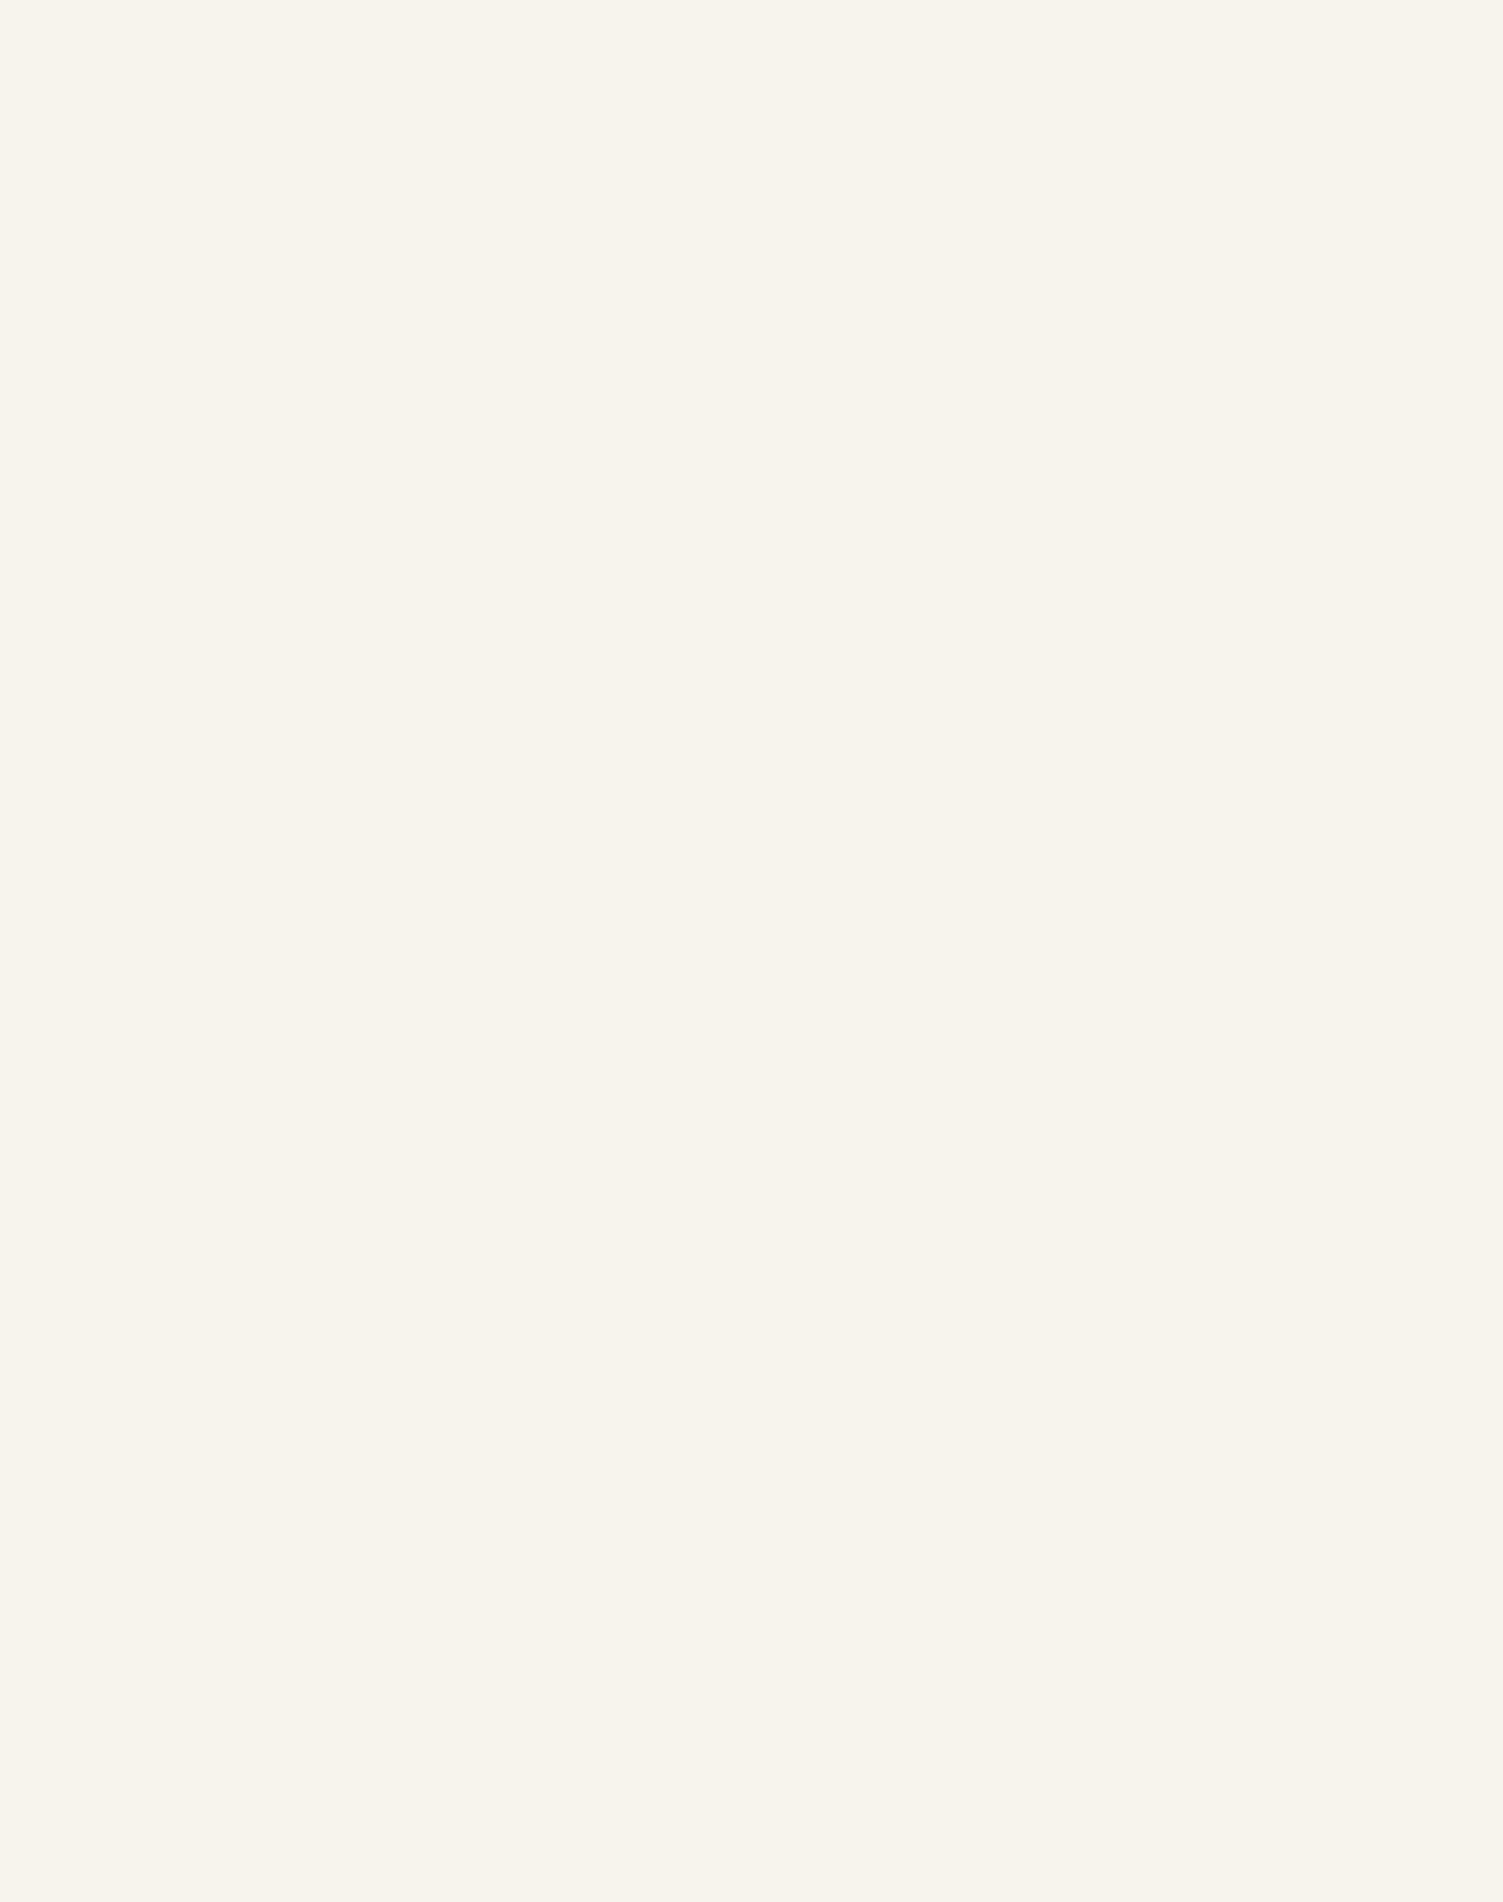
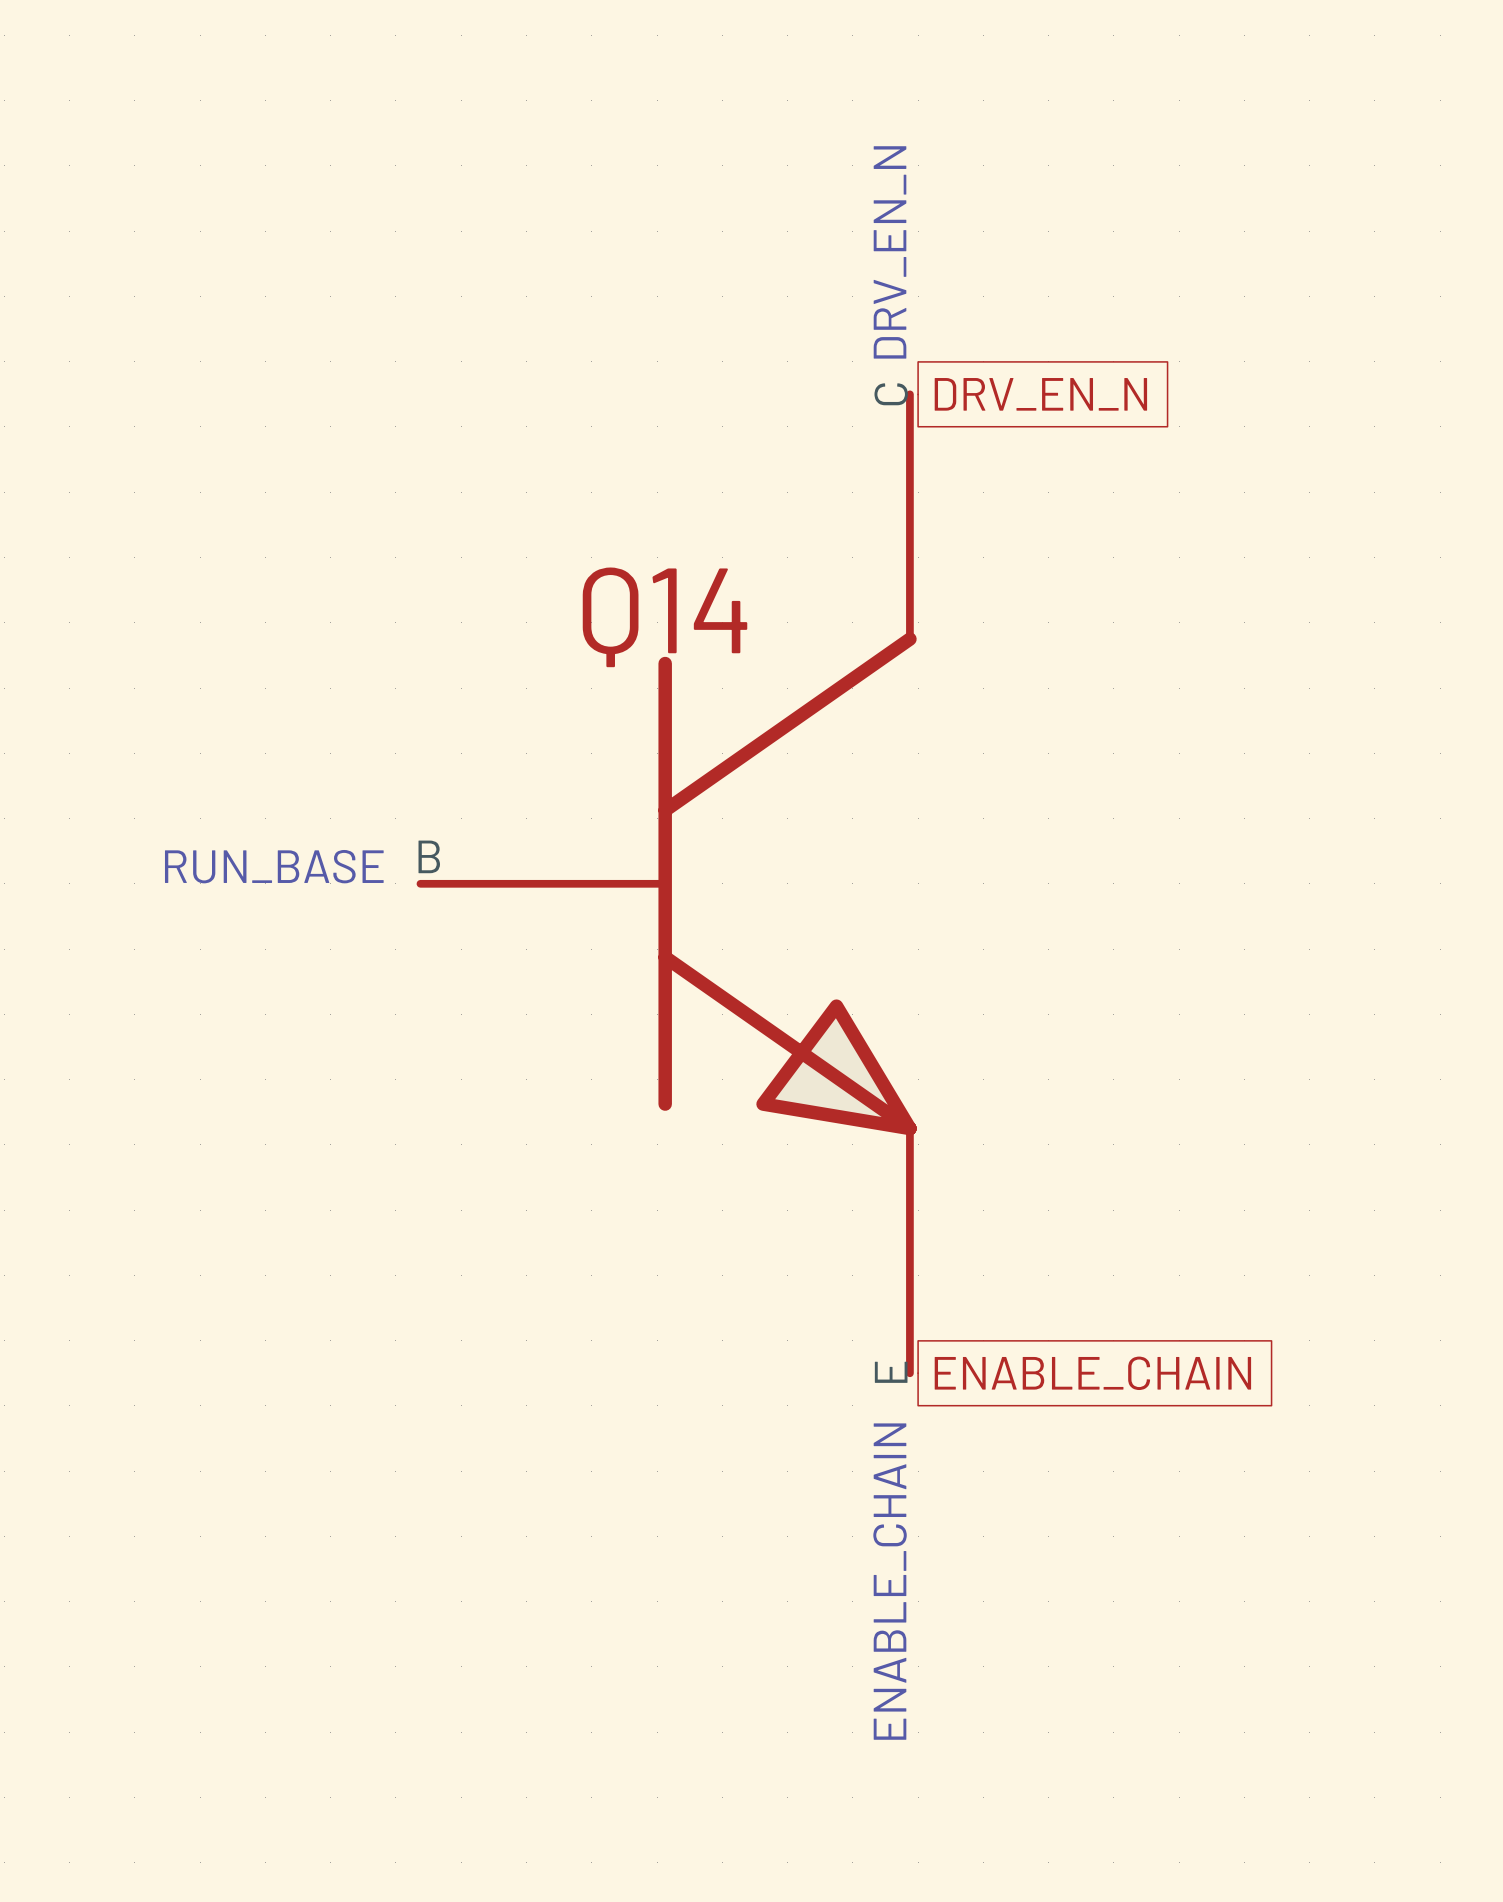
text: none -> DRV_EN_N (890, 252)
global label: none -> DRV_EN_N (1040, 394)
text: none -> RUN_BASE (274, 866)
part: none -> (667, 883)
global label: none -> ENABLE_CHAIN (1092, 1373)
text: none -> ENABLE_CHAIN (890, 1581)

